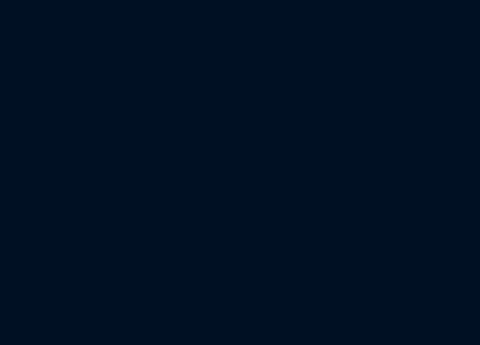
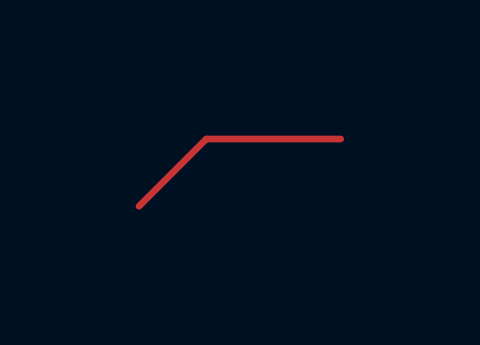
track: none -> (340, 139) (206, 139) (139, 206)

